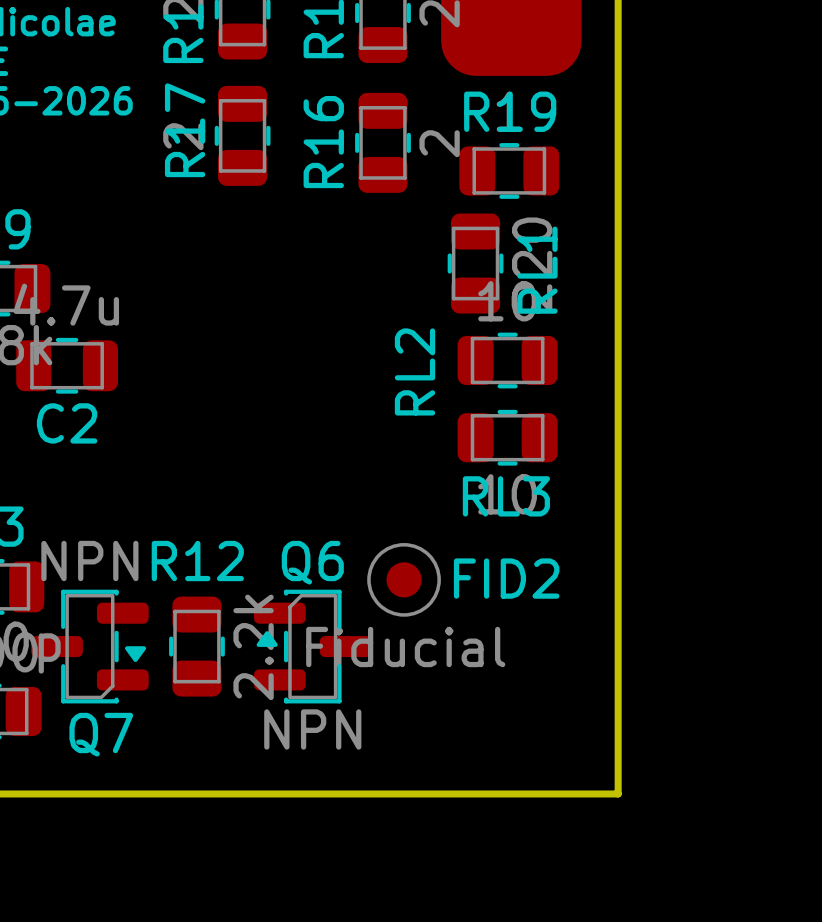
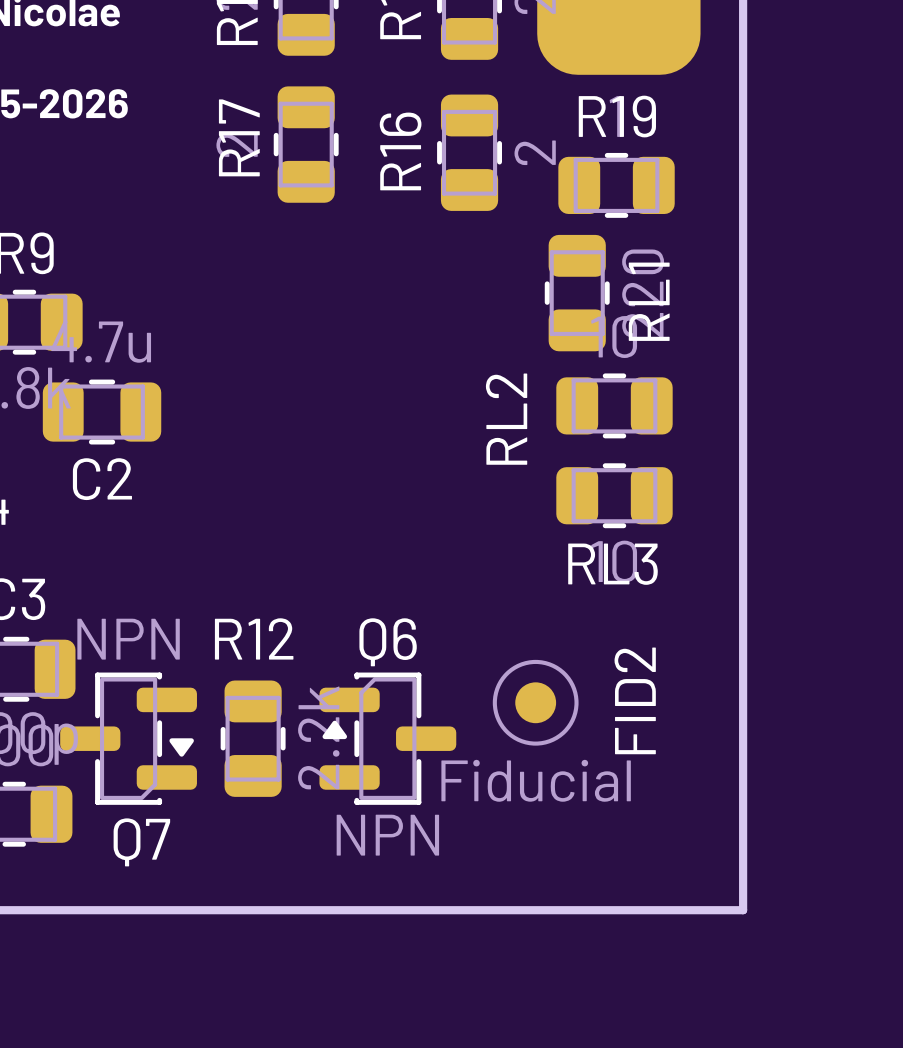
FID2 name rotation: 0° (506, 578) -> 90° counterclockwise (635, 700)
FID2 position: (404, 579) -> (535, 702)

